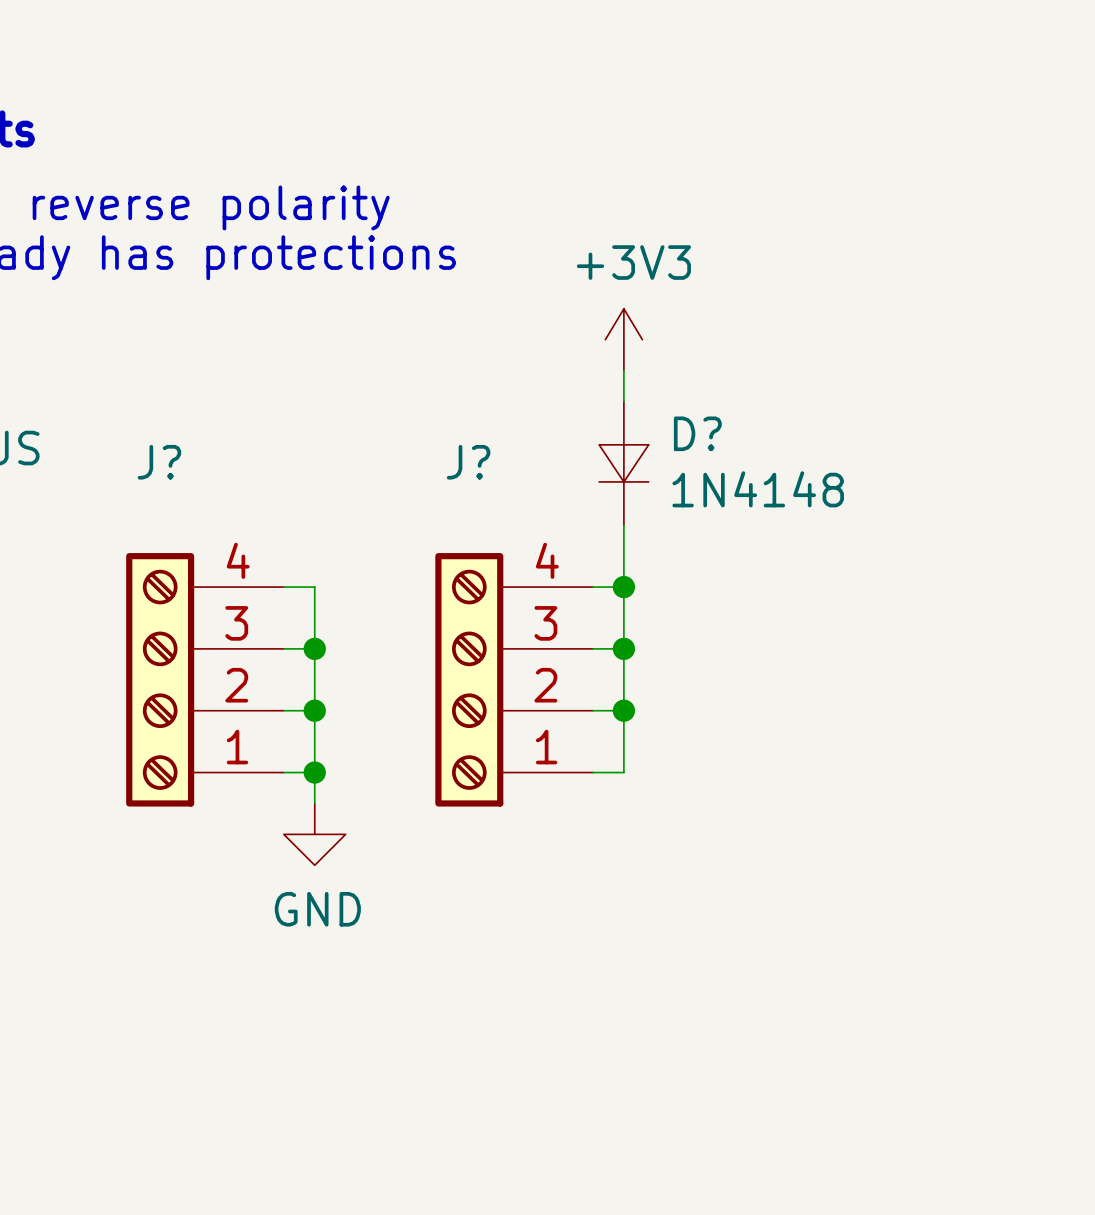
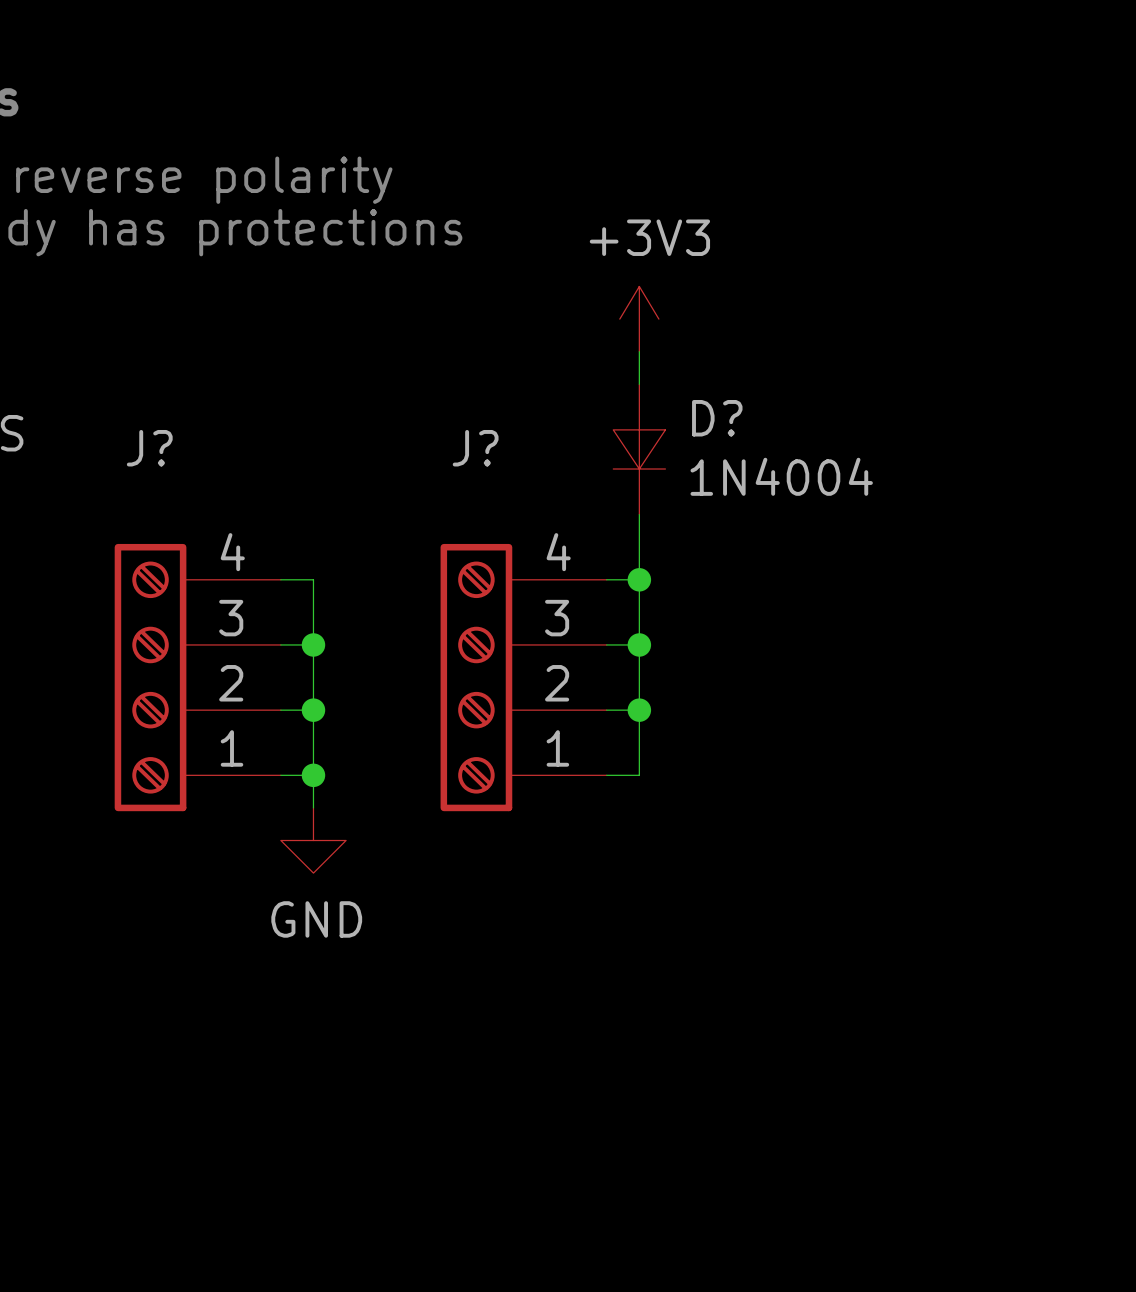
D? value: 1N4148 (758, 489) -> 1N4004 (781, 476)

